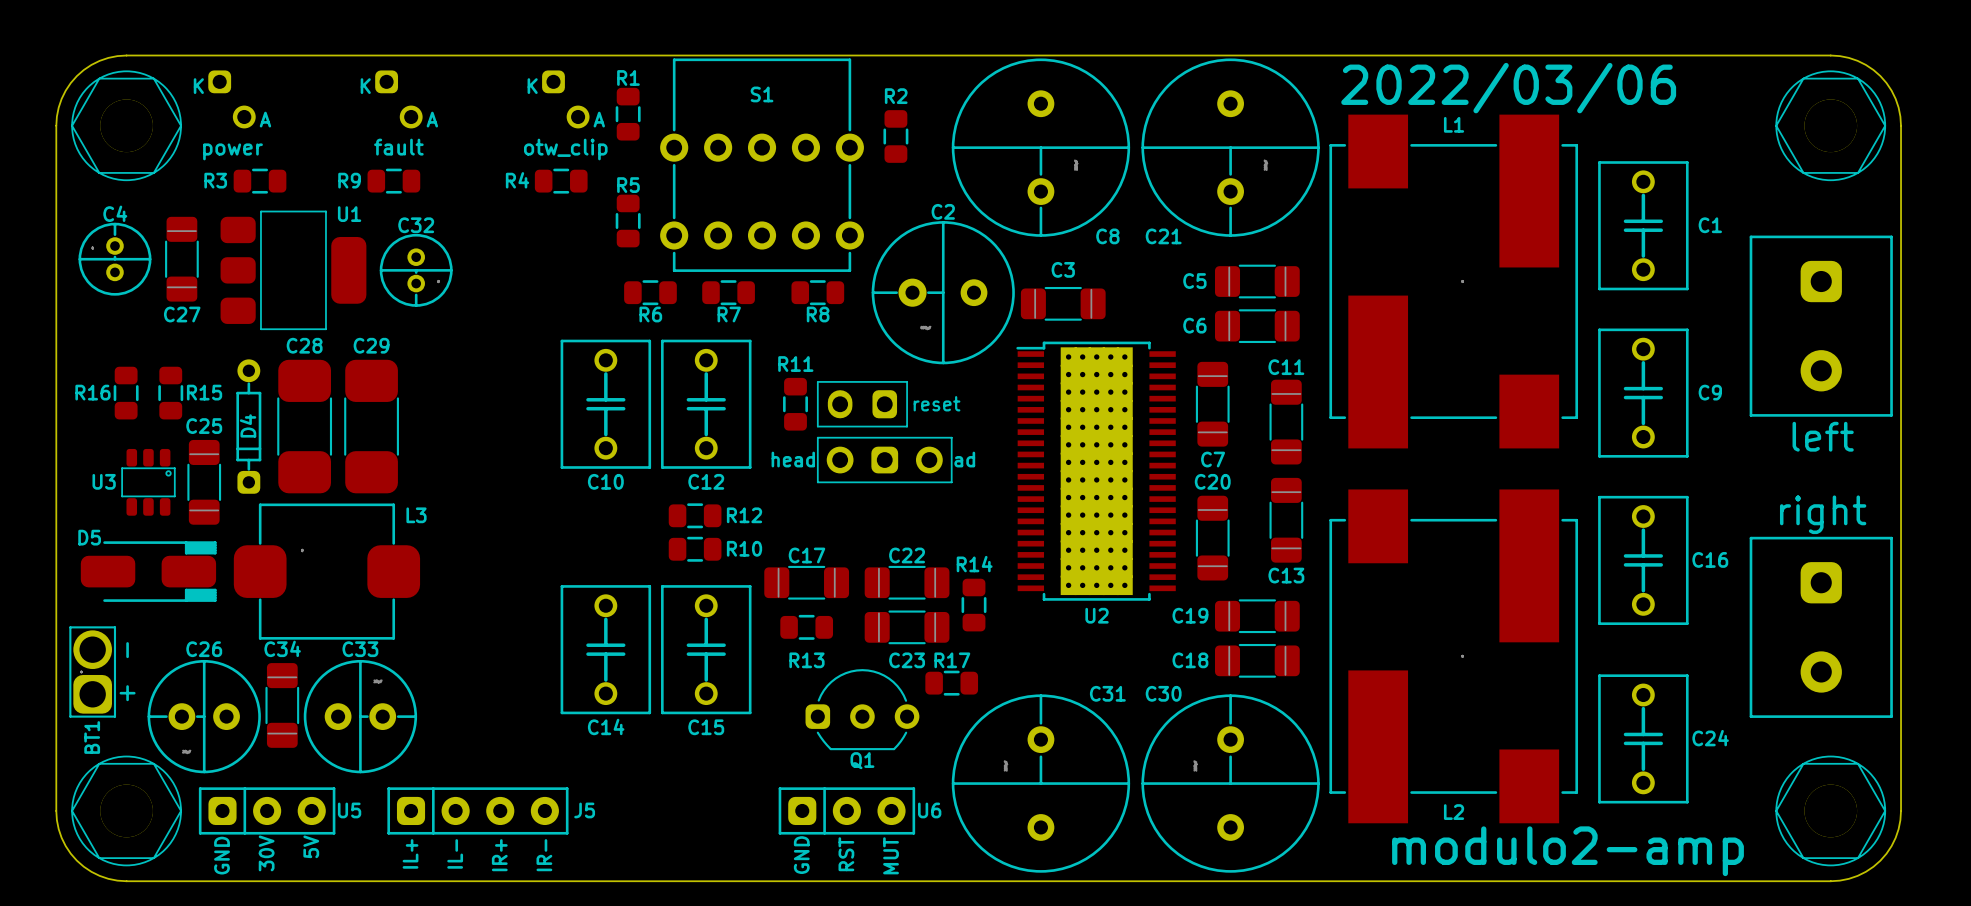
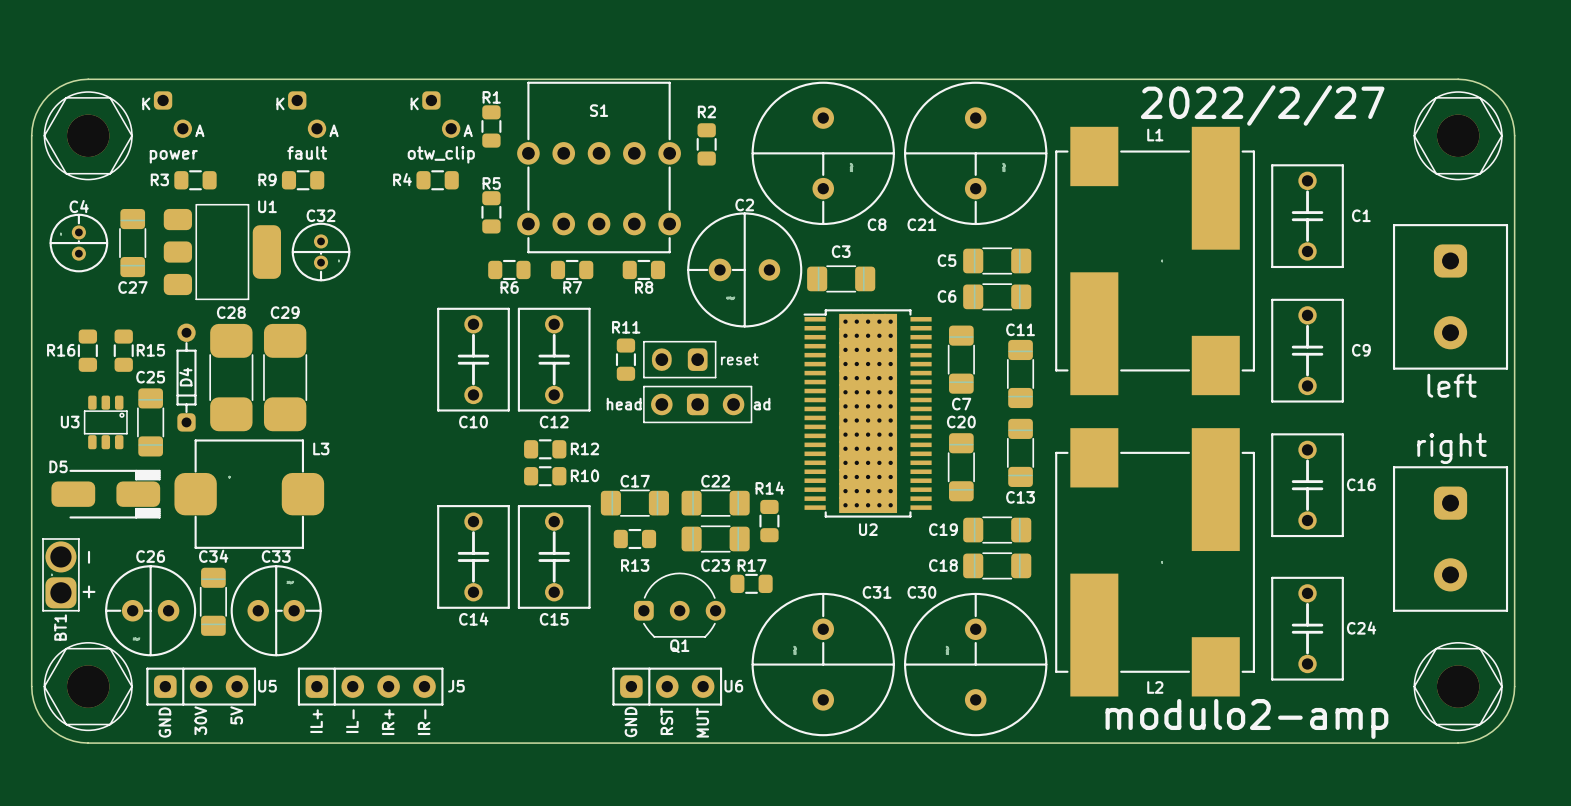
text: 2022/03/06 (1508, 88) -> 2022/2/27 (1262, 105)

